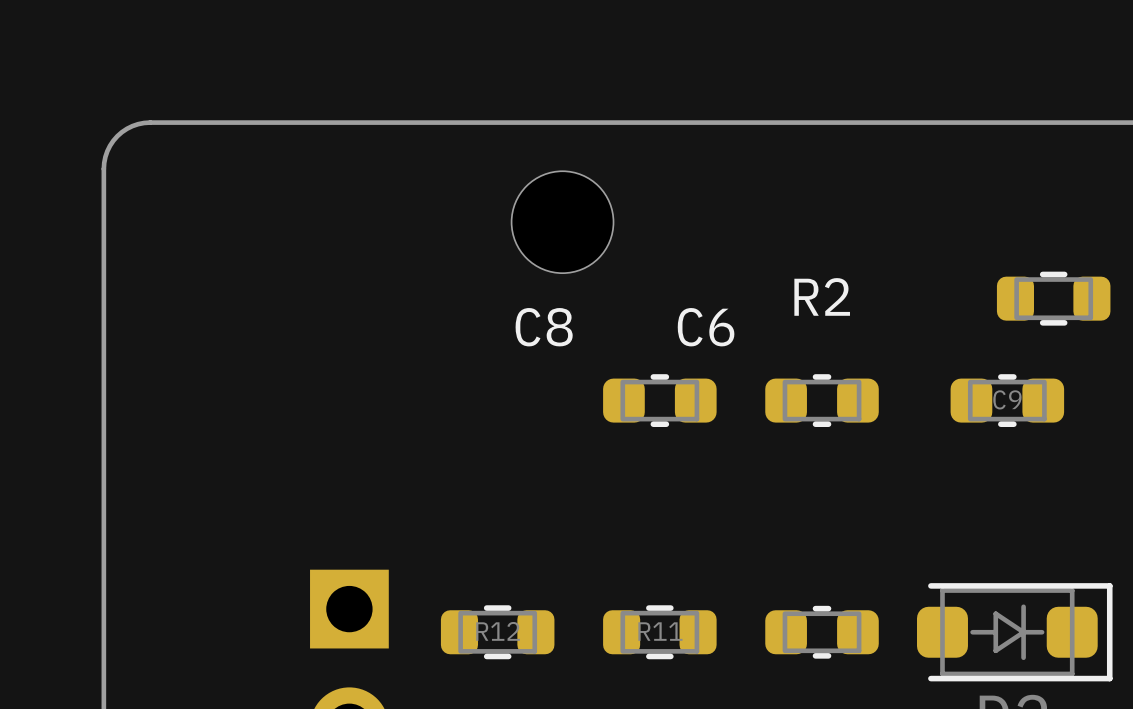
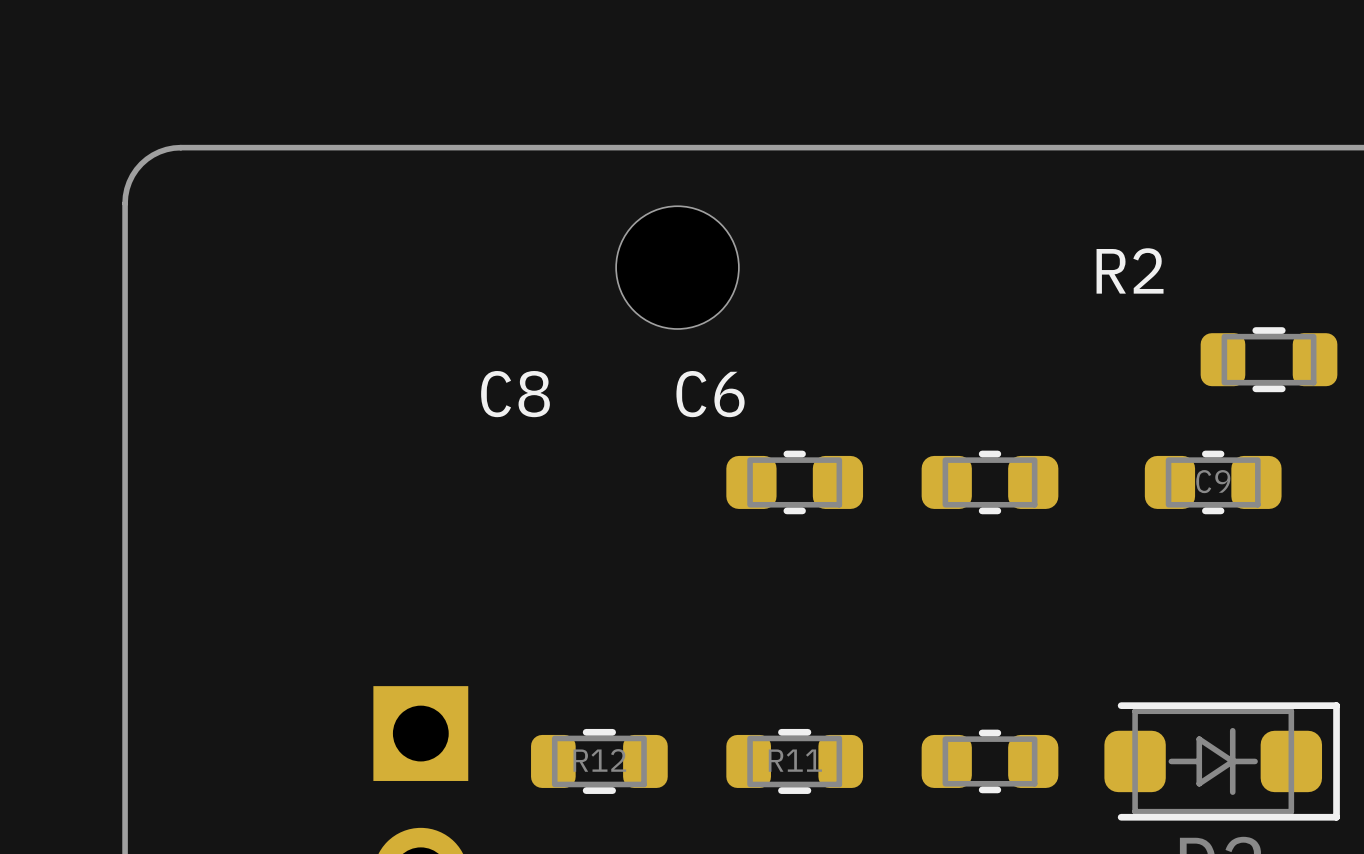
R2 name position: R2 (822, 296) -> R2 (1130, 270)
C8 name position: C8 (544, 327) -> C8 (515, 394)
C6 name position: C6 (706, 327) -> C6 (710, 394)

